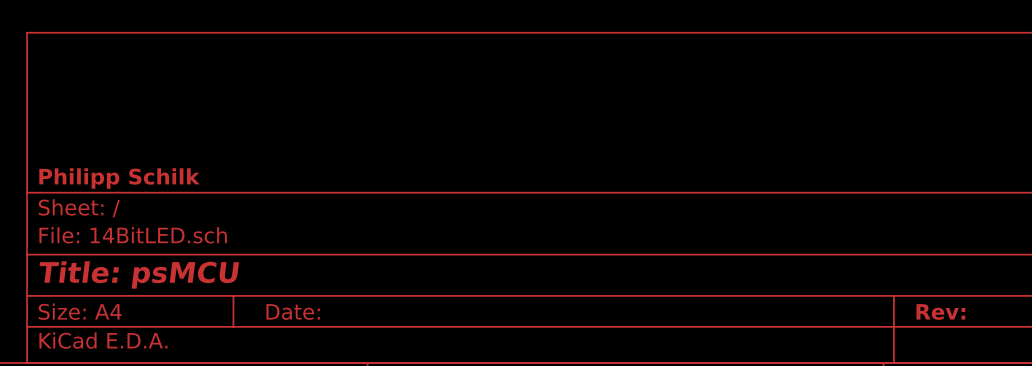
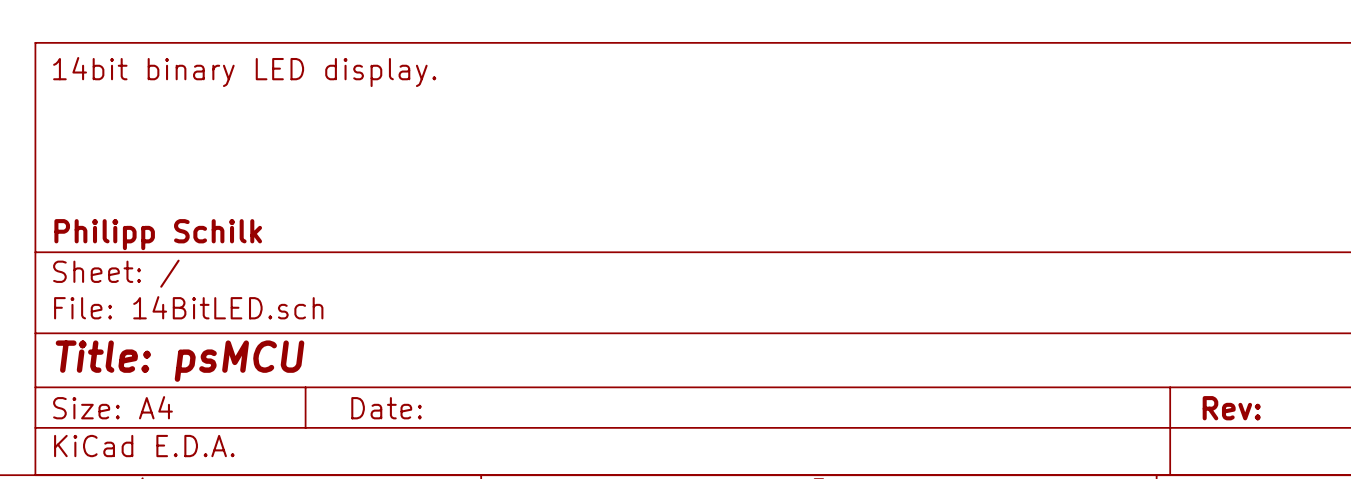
title block: none -> 14bit binary LED display. (244, 72)

